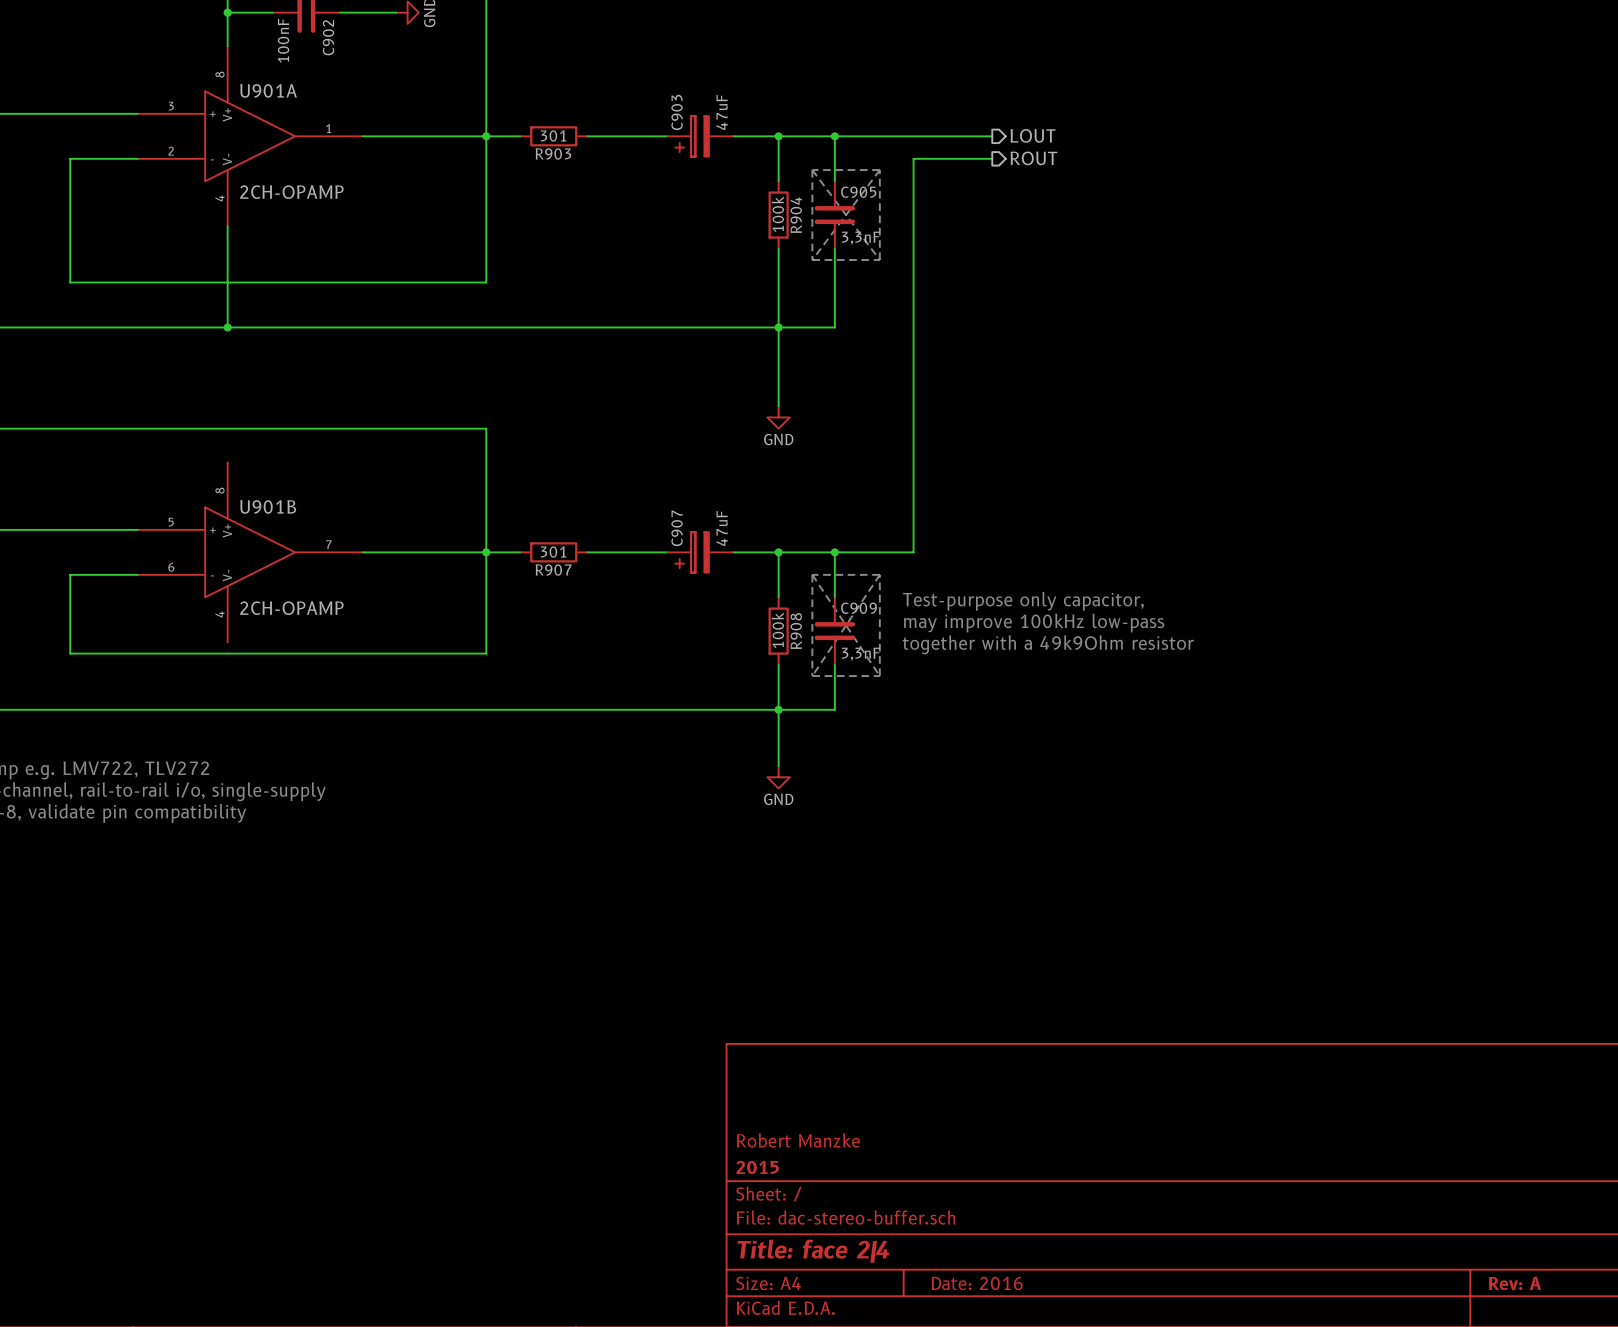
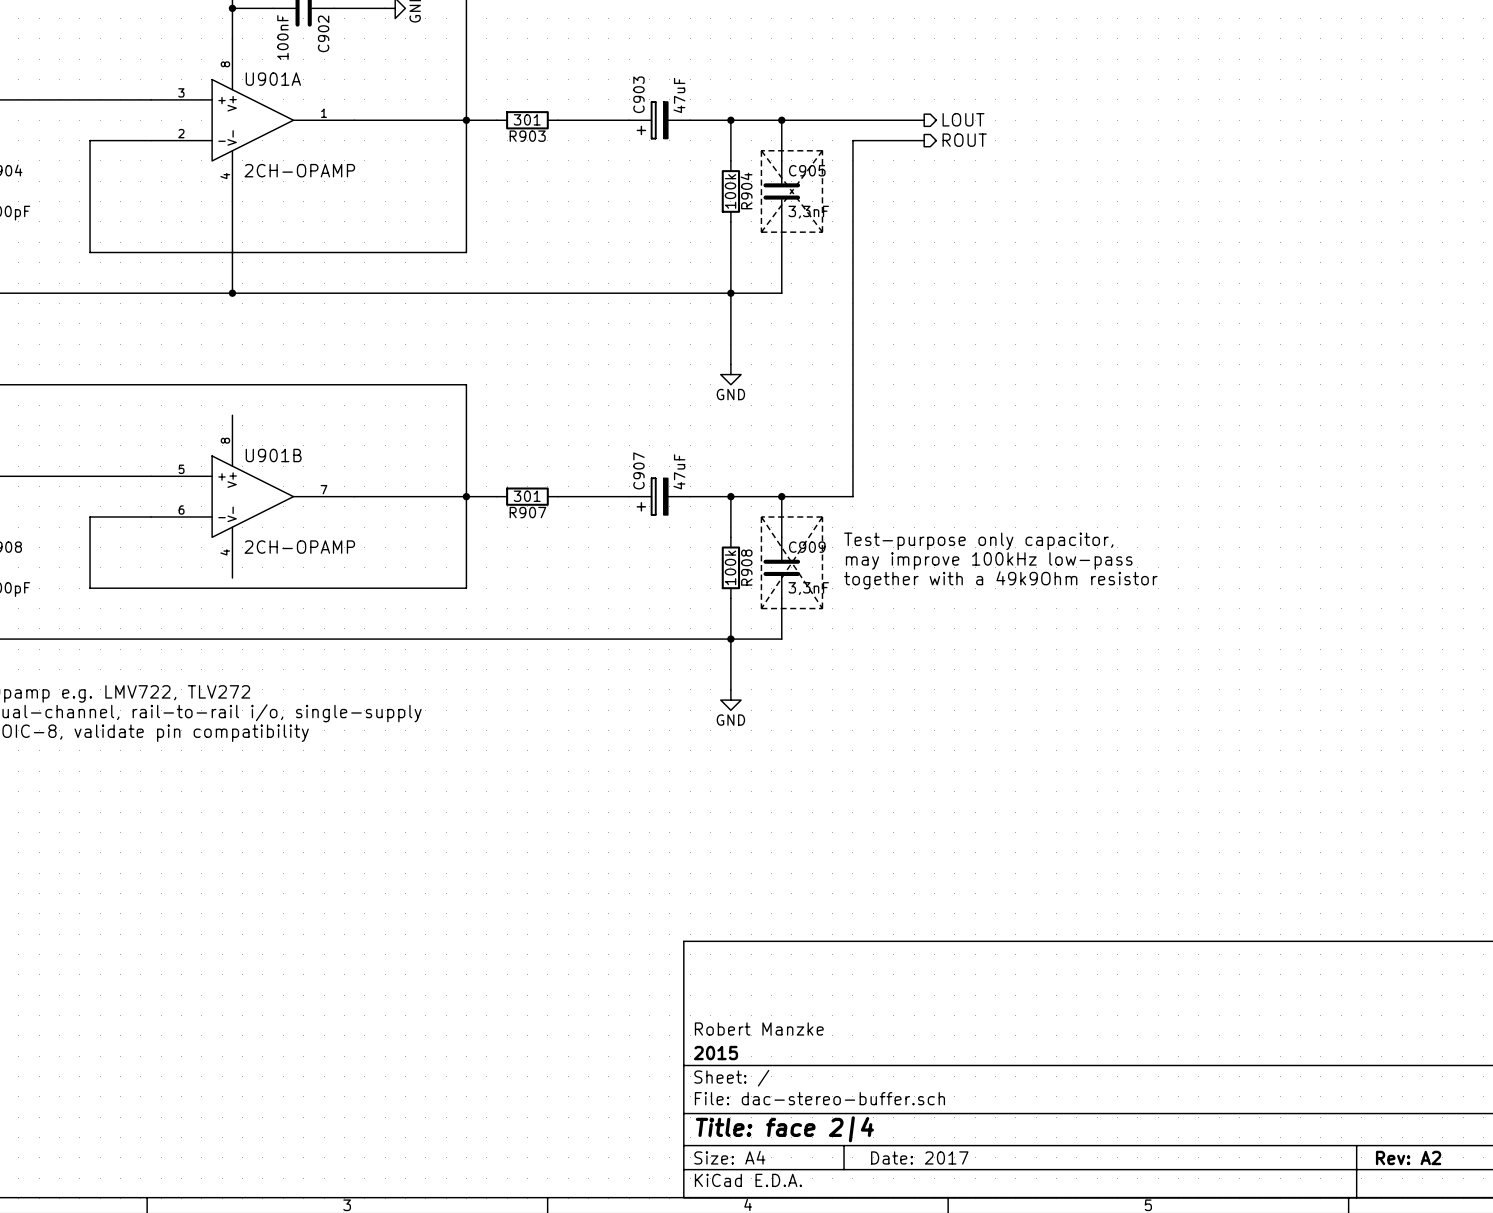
title block: Date: 2016 (977, 1283) -> Date: 2017 (919, 1157)
title block: Rev: A (1514, 1283) -> Rev: A2 (1408, 1157)

